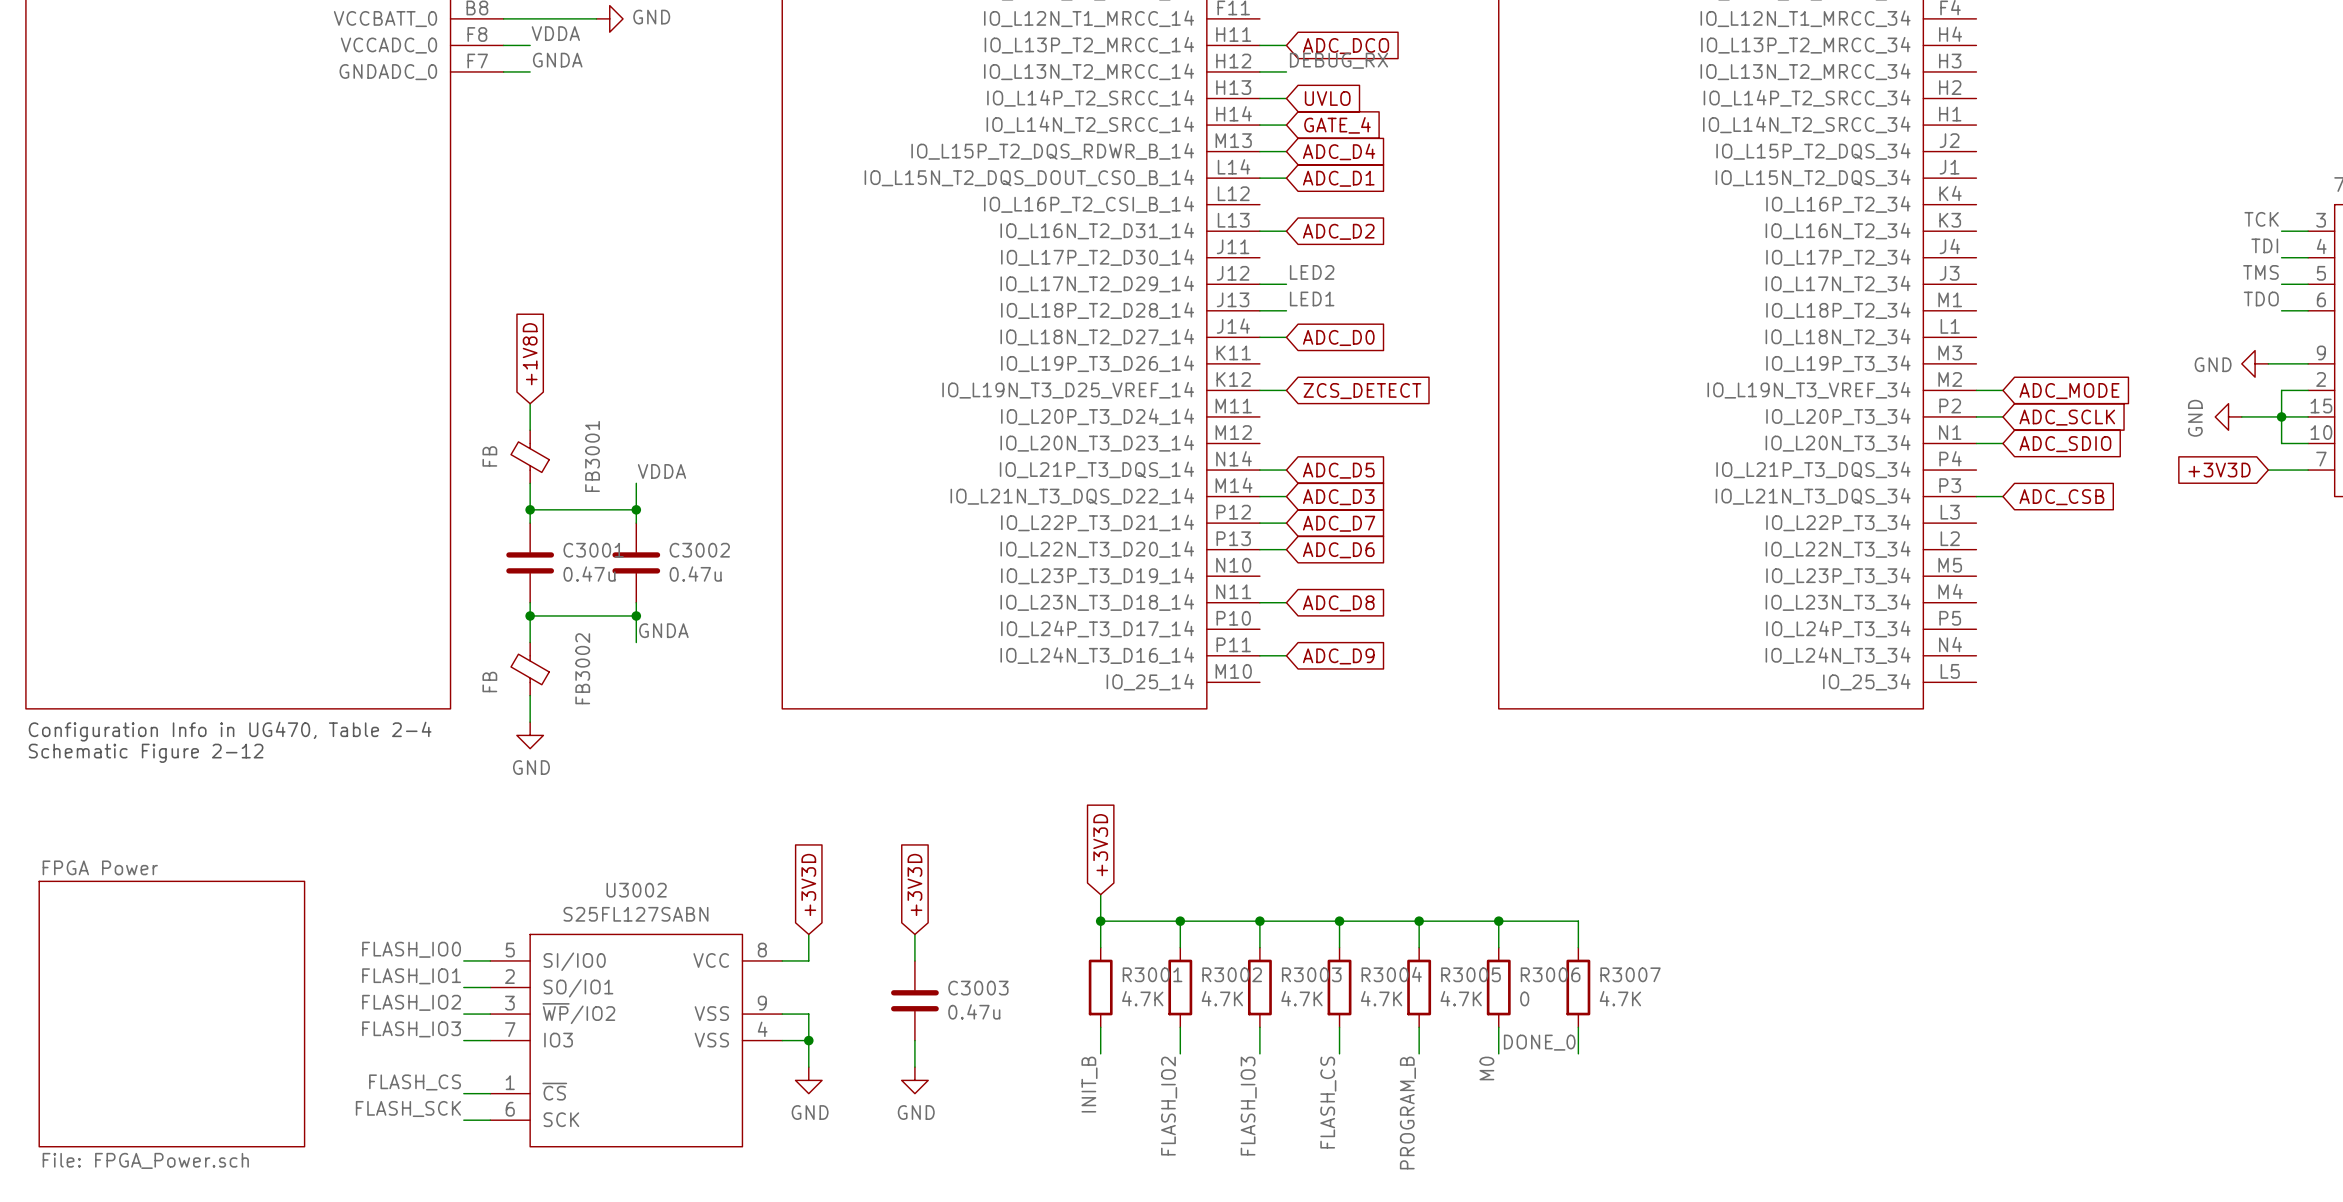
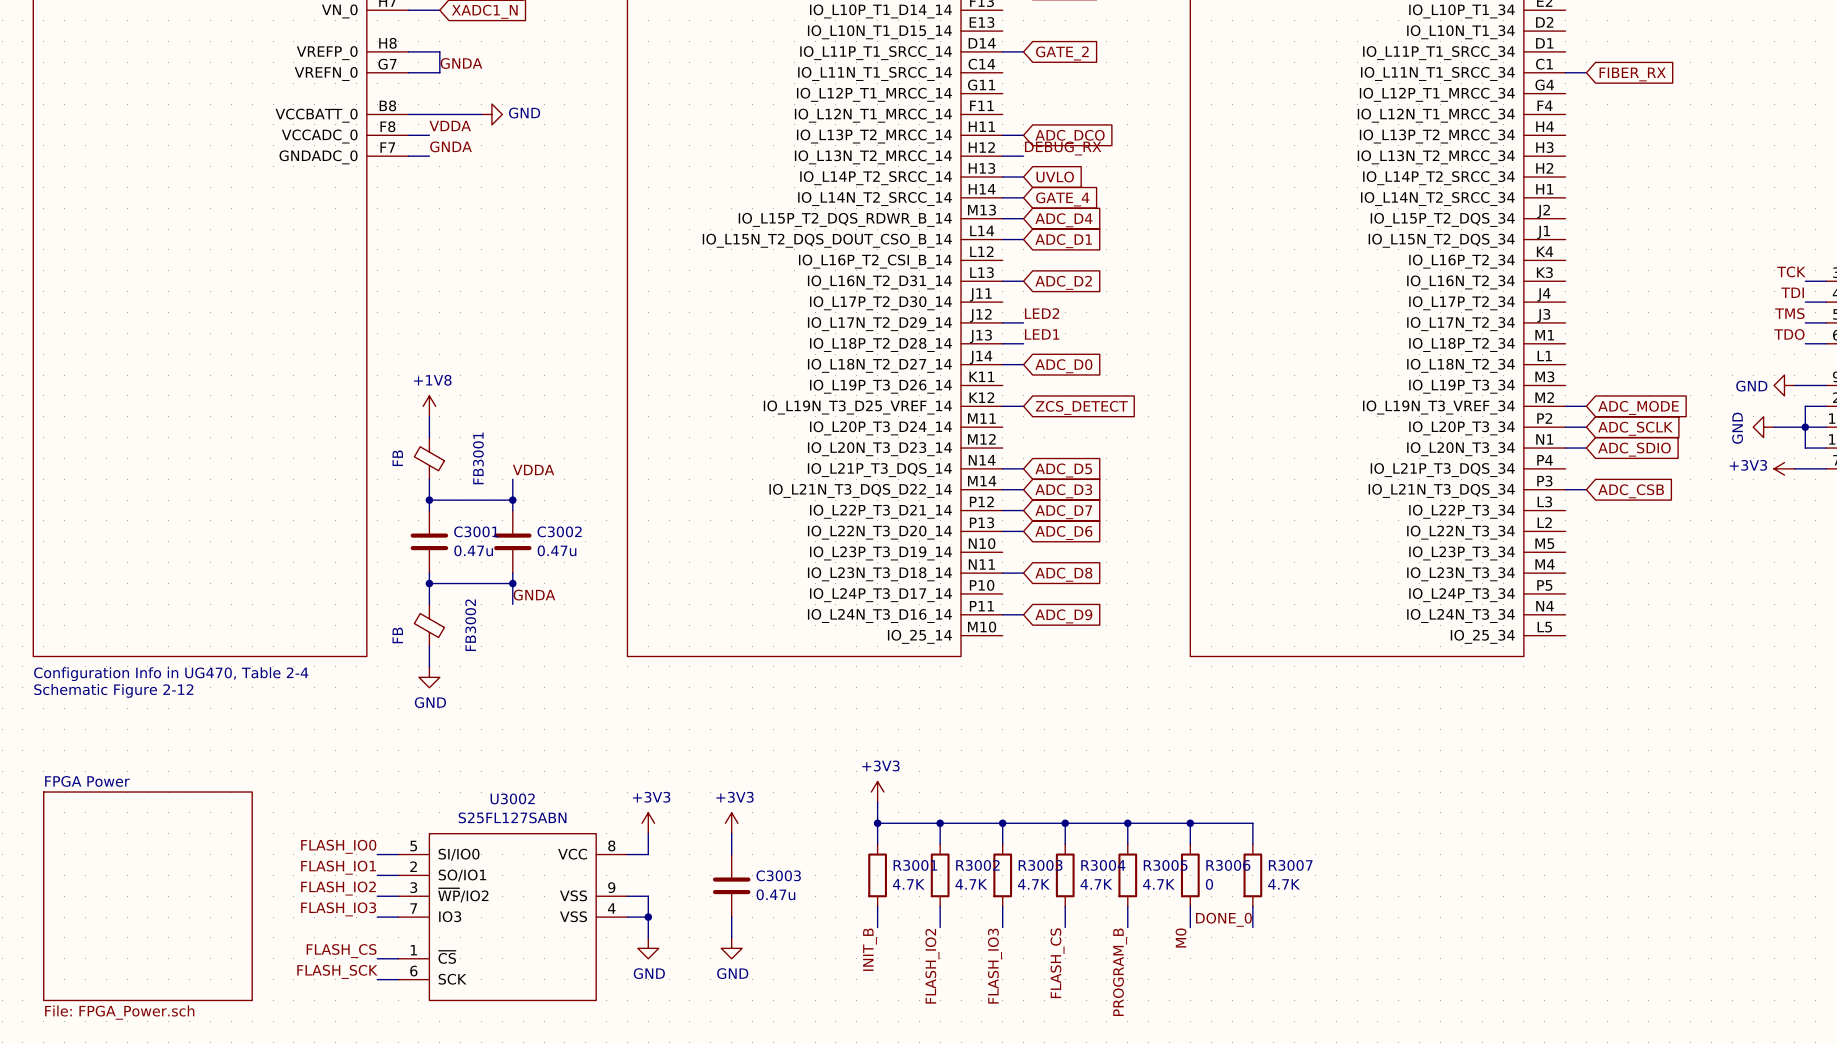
global label: +1V8D (530, 354) -> none
power symbol: none -> +1V8 (429, 406)
global label: +3V3D (2219, 470) -> none
power symbol: none -> +3V3 (1784, 468)
global label: +3V3D (1100, 845) -> none
power symbol: none -> +3V3 (877, 792)
global label: +3V3D (808, 884) -> none
global label: +3V3D (914, 884) -> none
power symbol: none -> +3V3 (648, 823)
power symbol: none -> +3V3 (731, 823)

